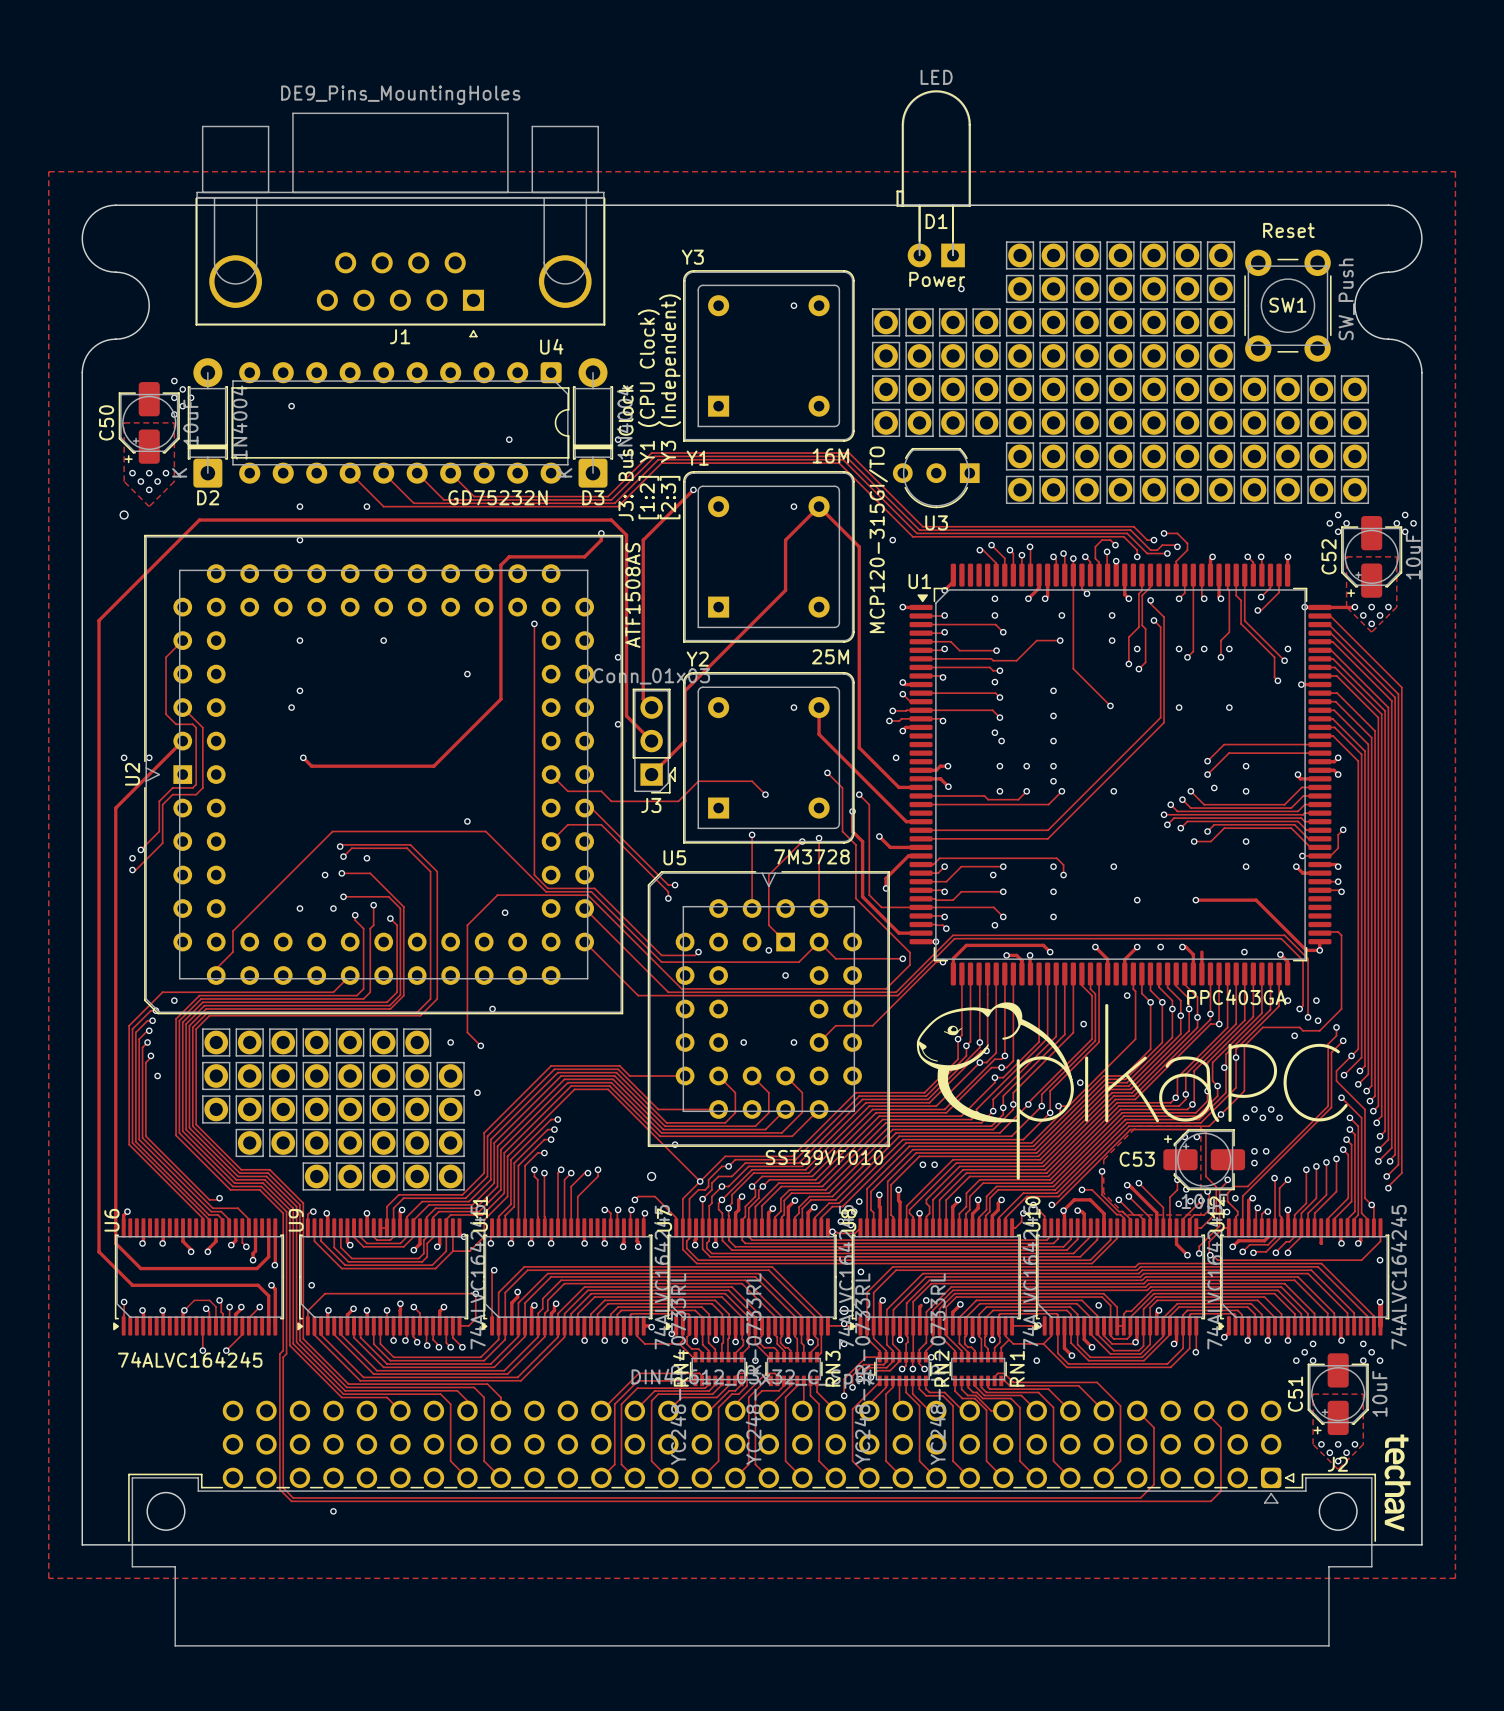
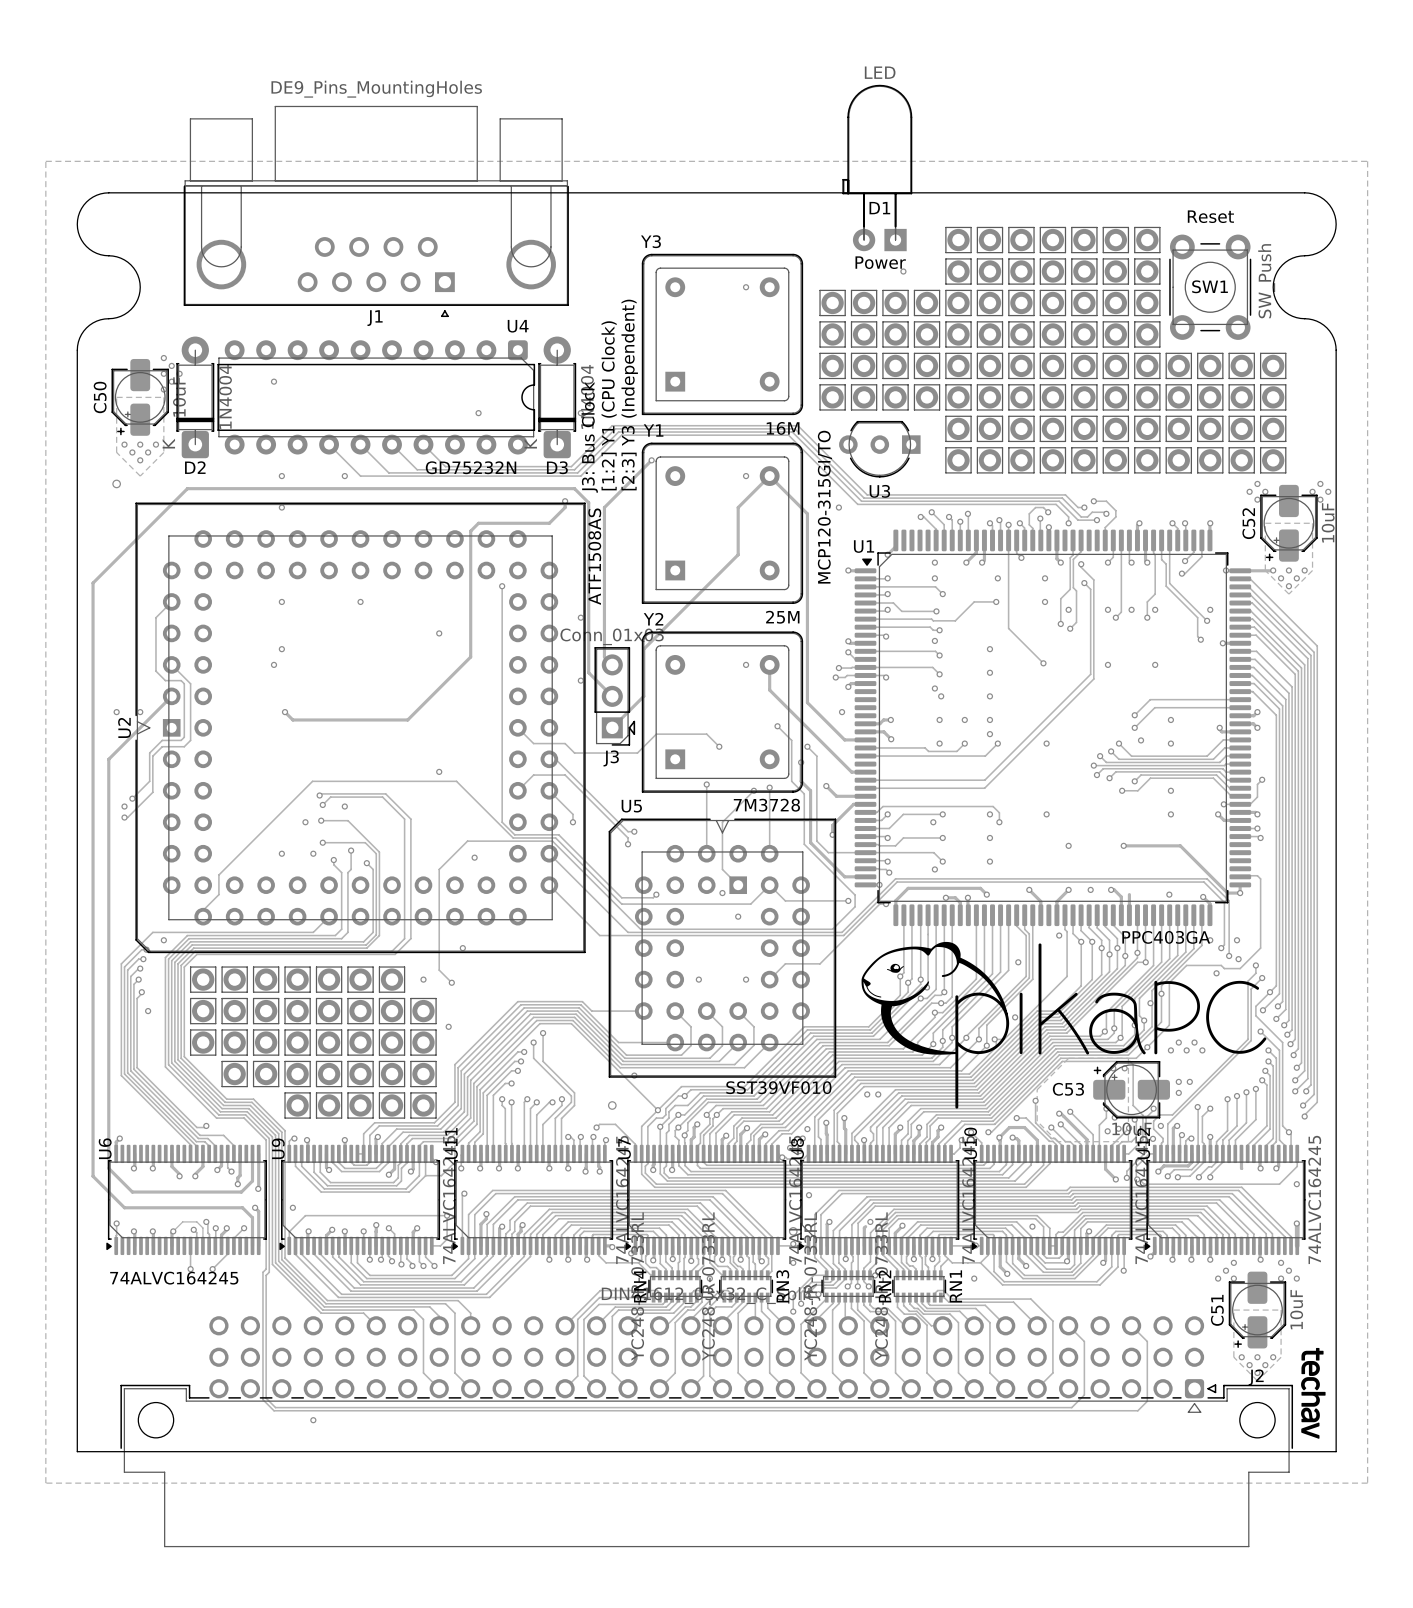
track: none -> (549, 790) (572, 814) (572, 822)
via: none -> (572, 822)
track: none -> (543, 1033) (543, 1061) (574, 1092) (574, 1105) (561, 1118) (561, 1153)
via: none -> (543, 1033)
track: none -> (533, 1042) (533, 1058) (571, 1096) (571, 1102) (555, 1118) (555, 1153)
via: none -> (533, 1042)

